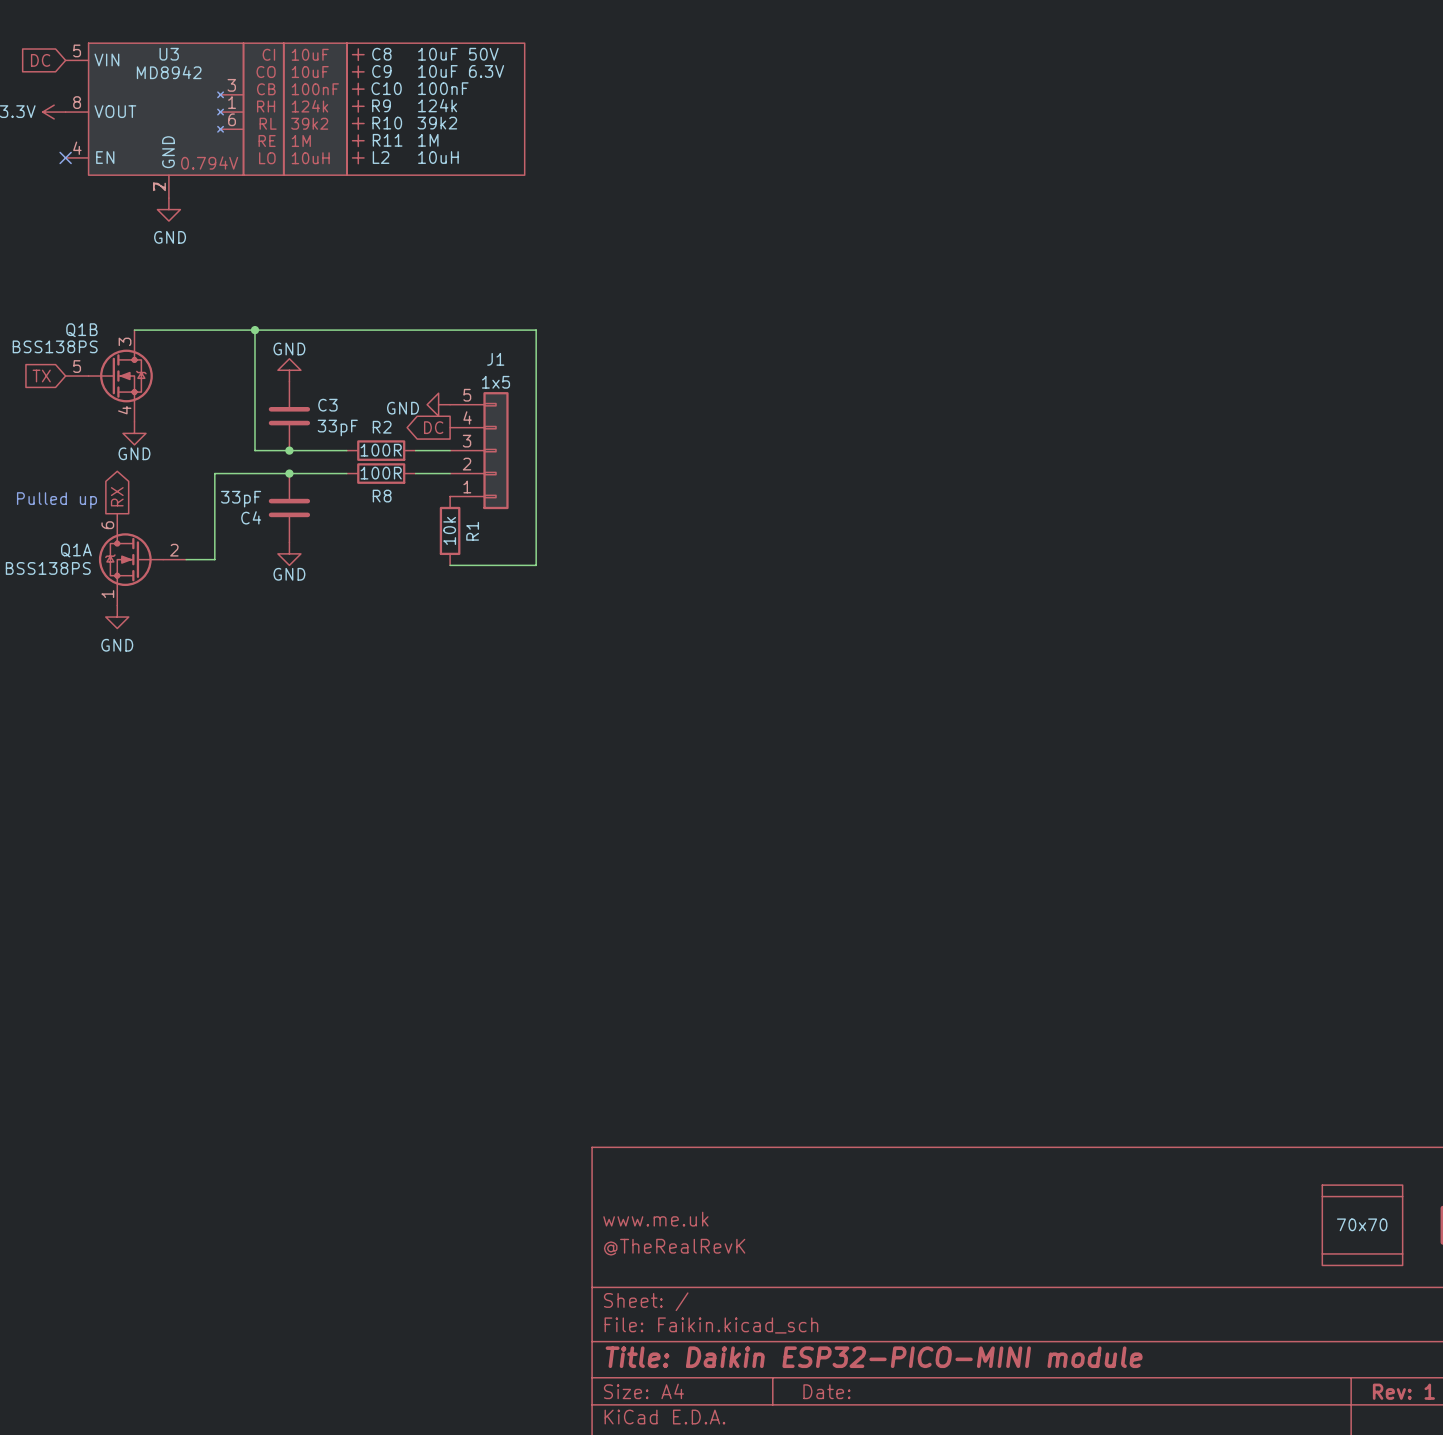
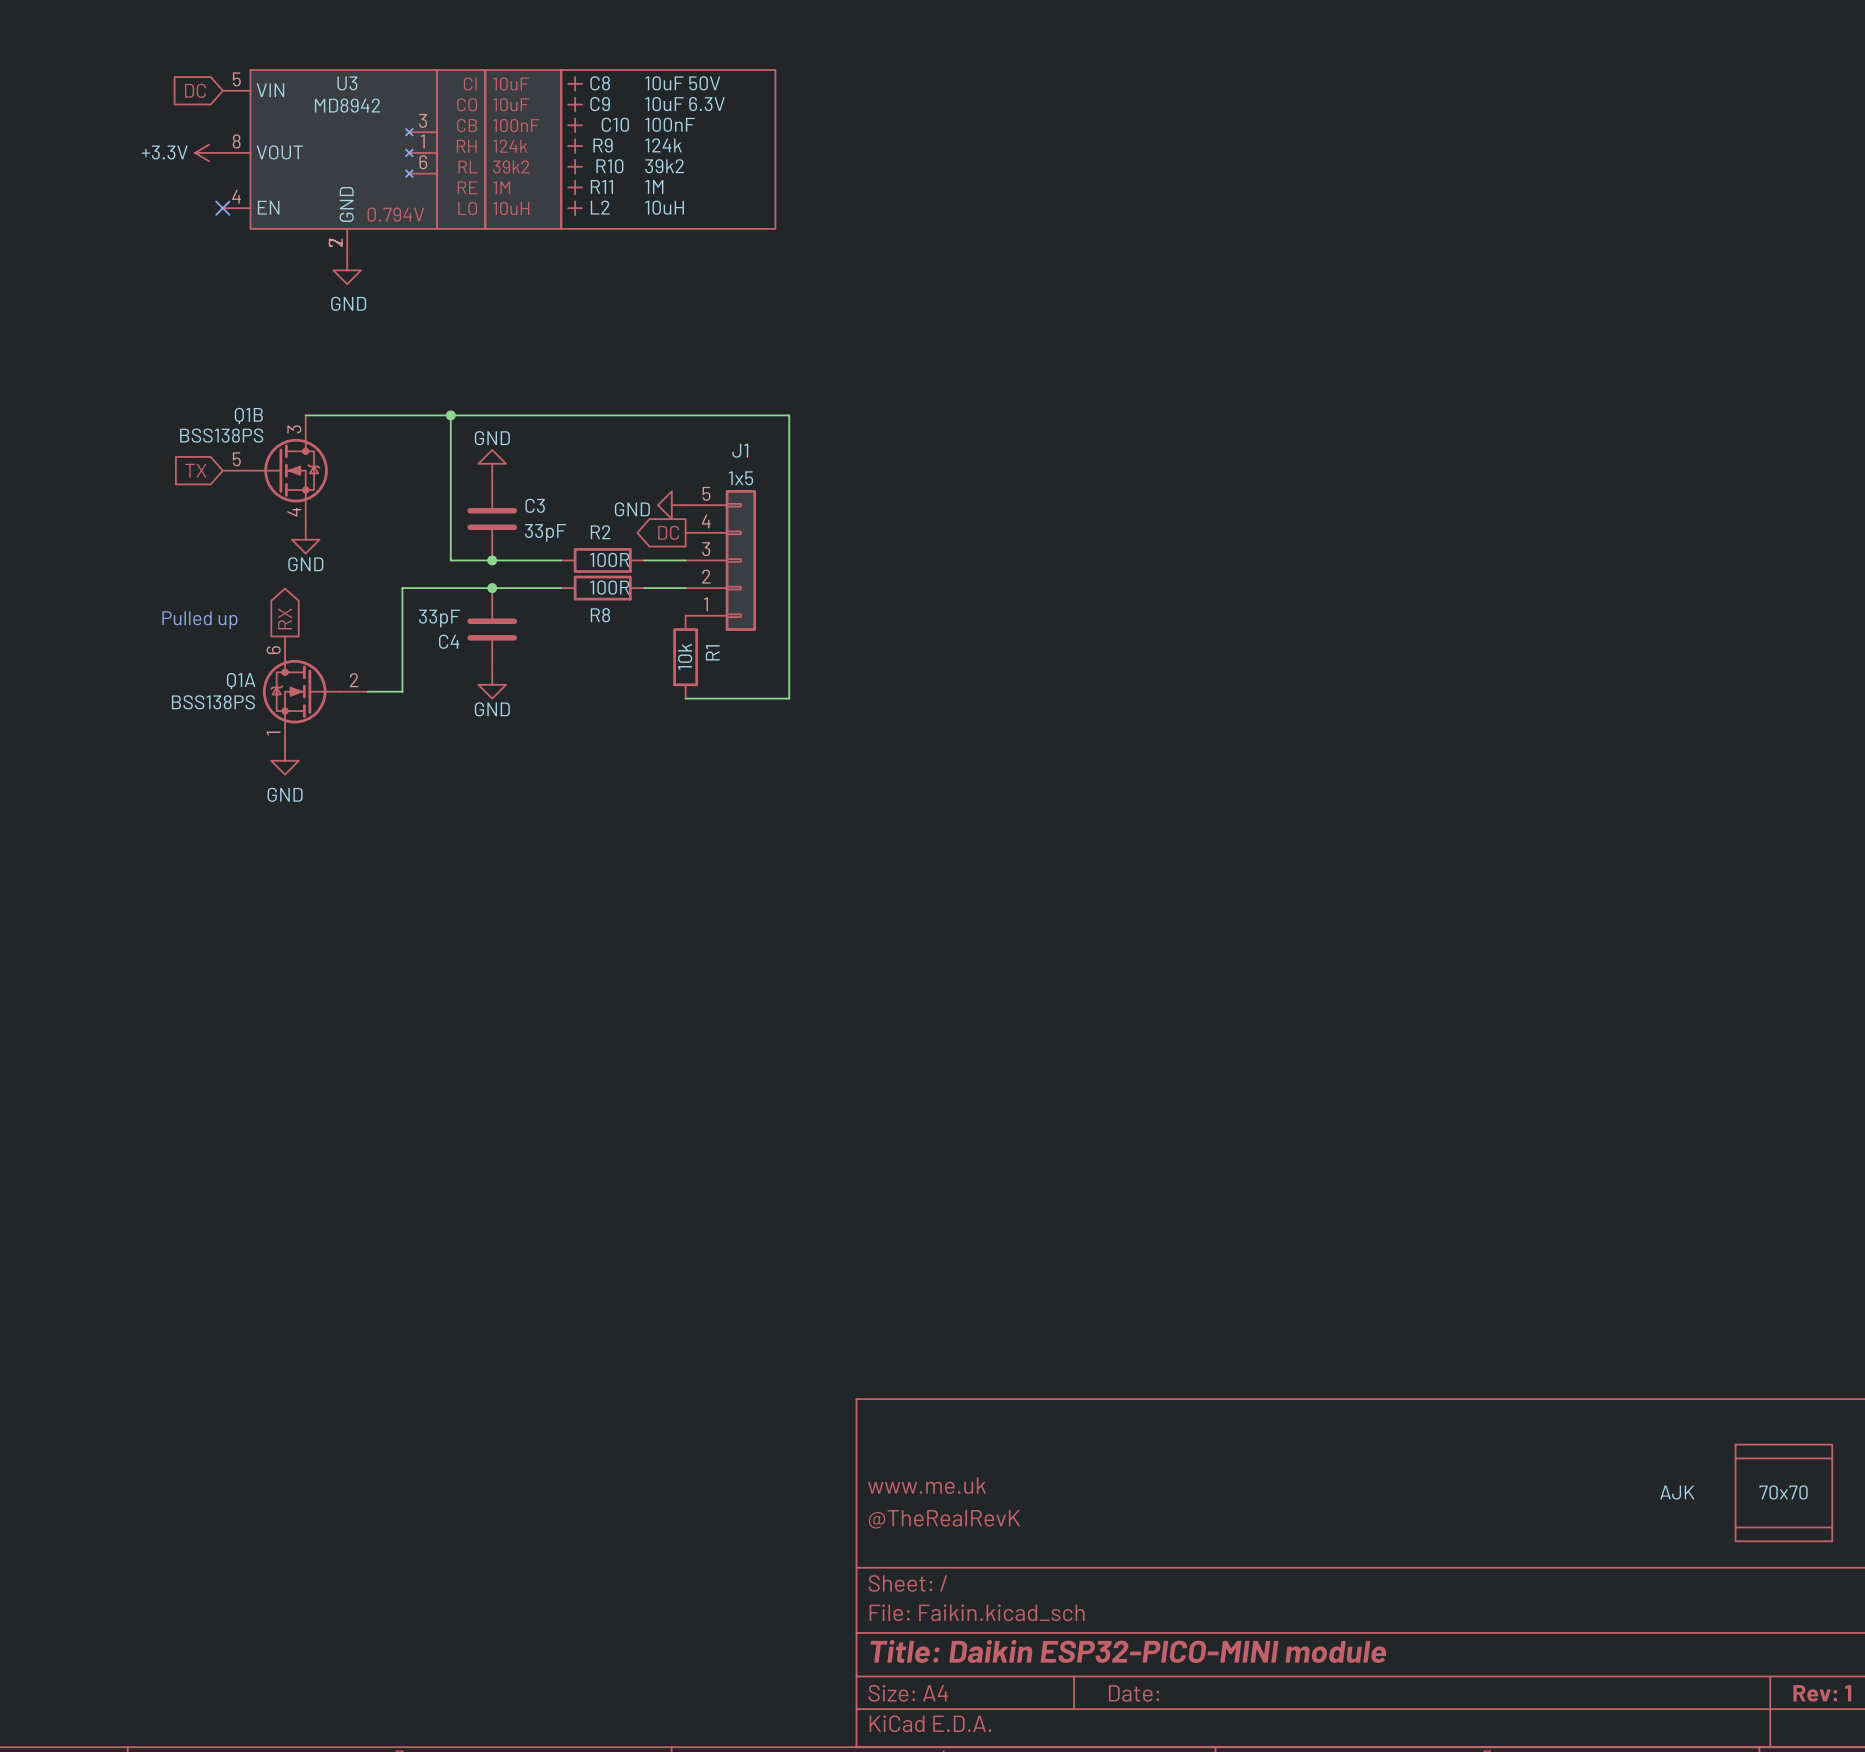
part: none -> AJK (1677, 1492)

